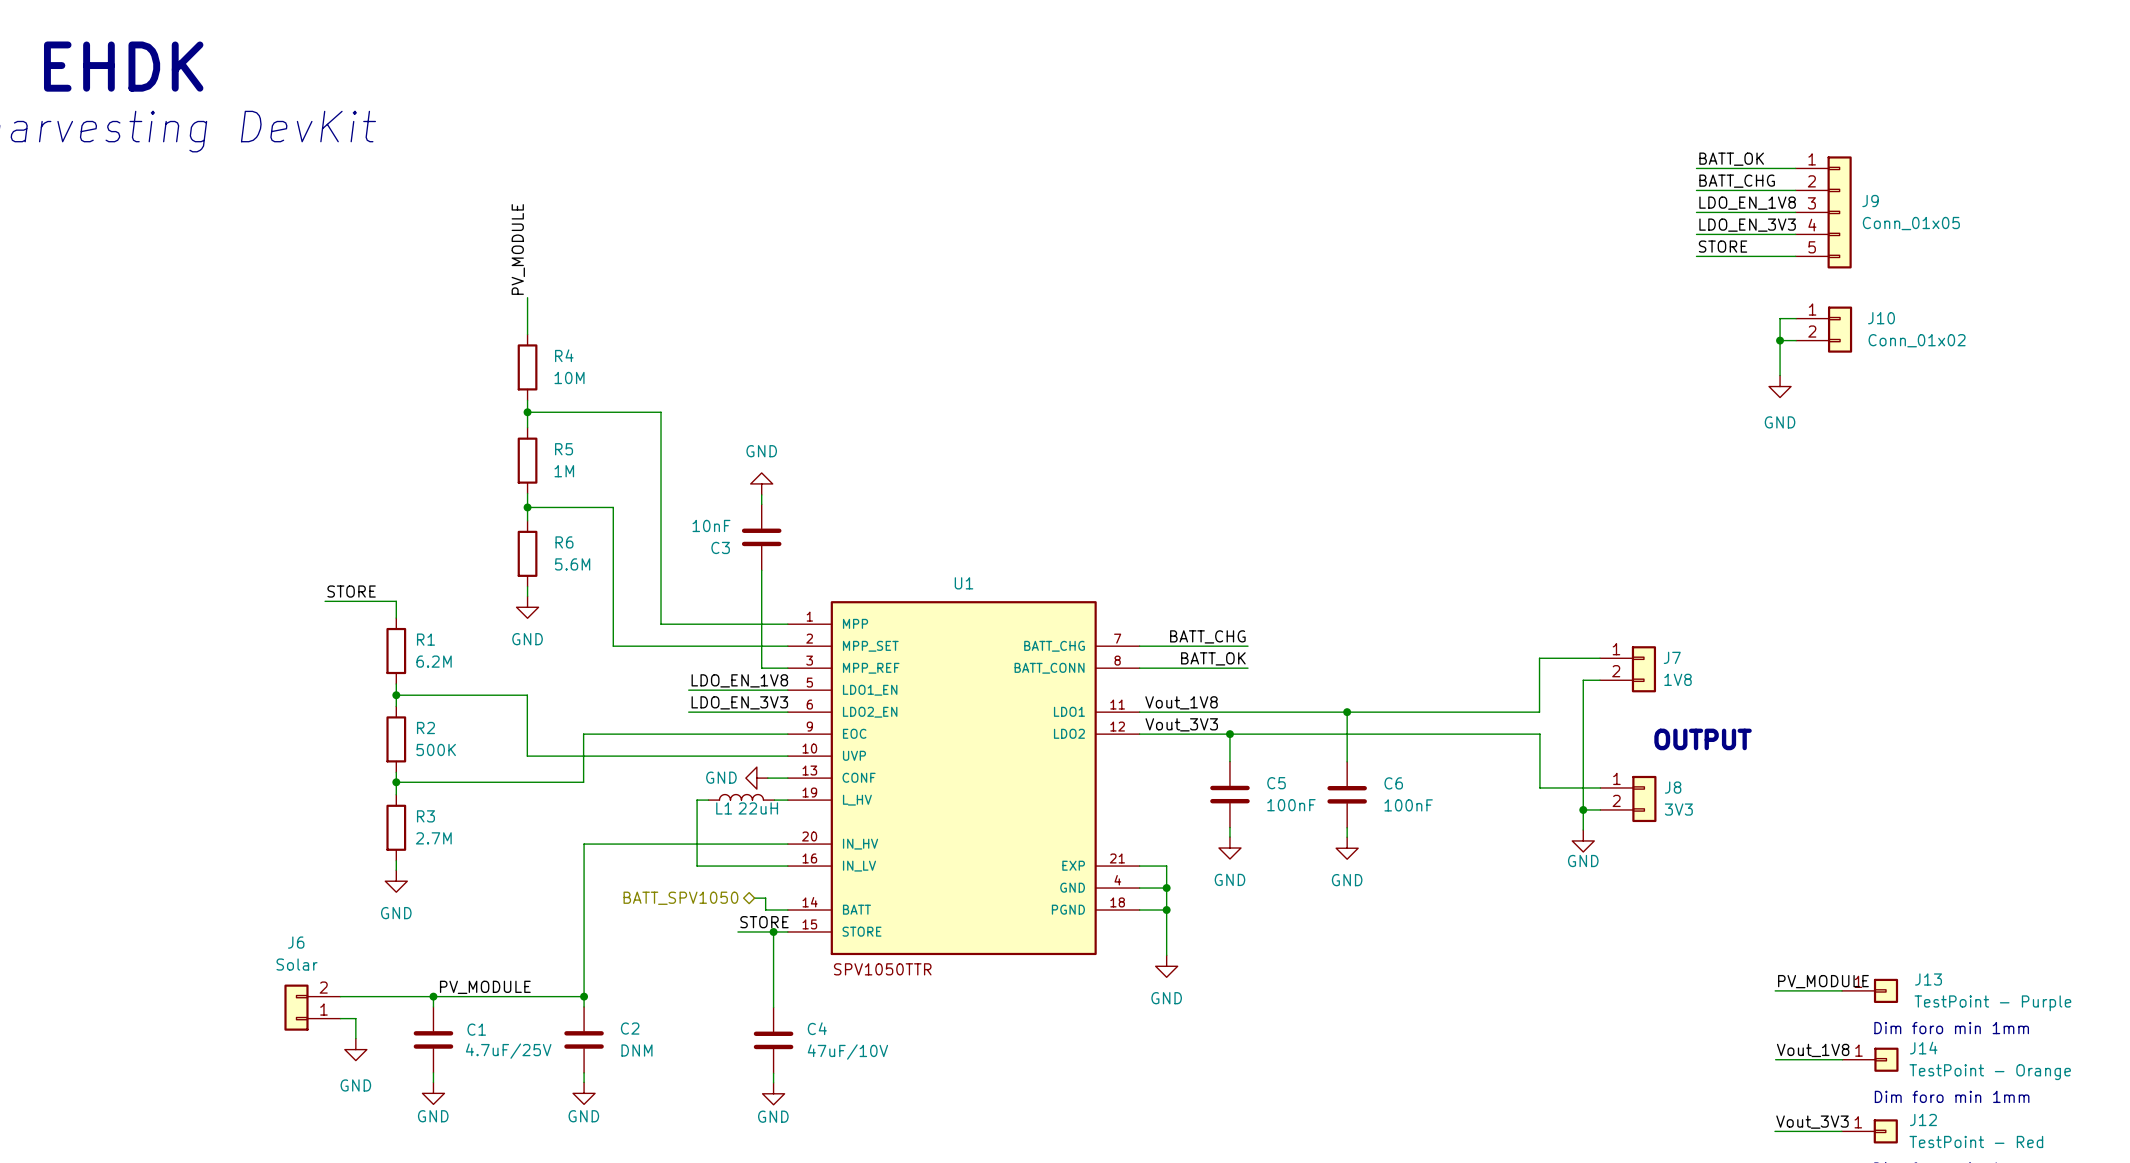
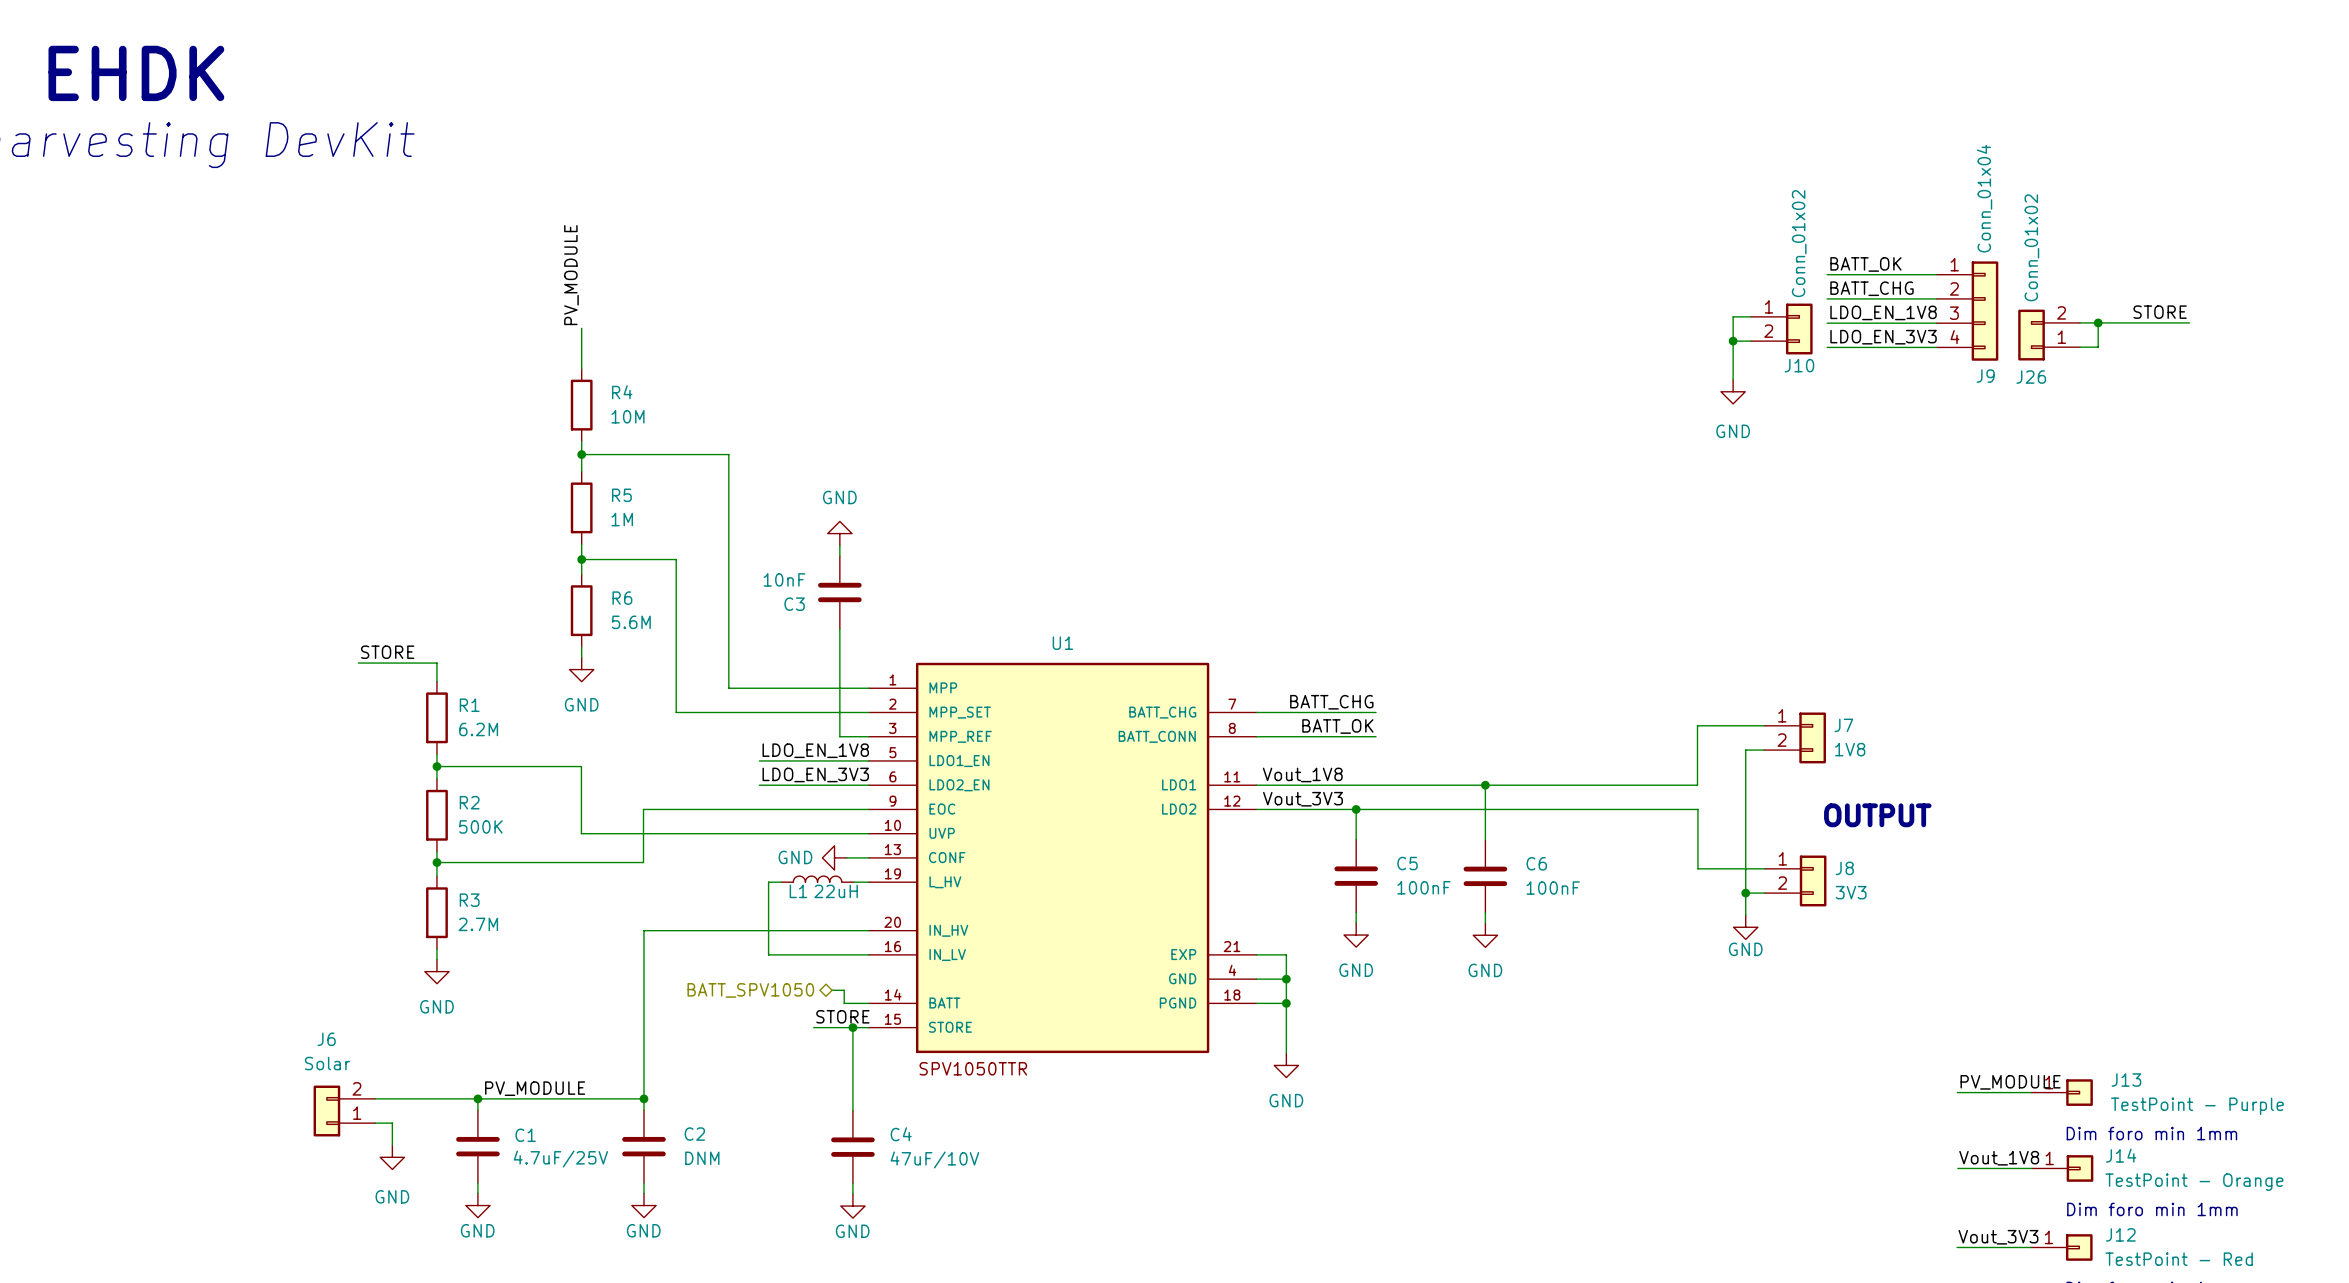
J9 symbol: [1795, 156, 1852, 269] -> [1936, 261, 1999, 361]
label position: BATT_OK (1731, 159) -> BATT_OK (1865, 264)
wire: (1696, 168) (1795, 168) -> none
label position: BATT_CHG (1737, 181) -> BATT_CHG (1872, 288)
wire: (1696, 190) (1795, 190) -> (1827, 274) (1936, 274)
J9 name position: J9 (1870, 201) -> J9 (1985, 376)
label position: LDO_EN_1V8 (1747, 203) -> LDO_EN_1V8 (1883, 312)
wire: (1696, 212) (1795, 212) -> (1827, 298) (1936, 298)
J9 value: Conn_01x05 (1911, 223) -> Conn_01x04 (1984, 198)
label position: LDO_EN_3V3 (1747, 225) -> LDO_EN_3V3 (1883, 337)
wire: (1696, 234) (1795, 234) -> (1827, 323) (1936, 323)
label: STORE (1723, 246) -> none
wire: (1696, 256) (1795, 256) -> (1827, 347) (1936, 347)
label: none -> STORE (2160, 312)
wire: none -> (2080, 322) (2189, 322)
wire: none -> (2098, 322) (2098, 347) (2080, 347)
junction: none -> (2098, 322)
J26: none -> Conn_01x02 (2049, 335)
junction: none -> (1733, 341)
wire: (1796, 318) (1780, 318) (1780, 375) -> (1750, 316) (1733, 316) (1733, 379)
J10 name position: J10 (1881, 318) -> J10 (1799, 365)
J10 position: (1824, 329) -> (1781, 329)
wire: (1780, 340) (1796, 340) -> (1733, 341) (1750, 341)
junction: (1780, 340) -> none
J10 value rotation: 0° (1917, 340) -> 90° counterclockwise (1799, 243)
J10 value position: Conn_01x02 (1917, 340) -> Conn_01x02 (1799, 243)
power symbol position: GND (1780, 386) -> GND (1733, 391)

